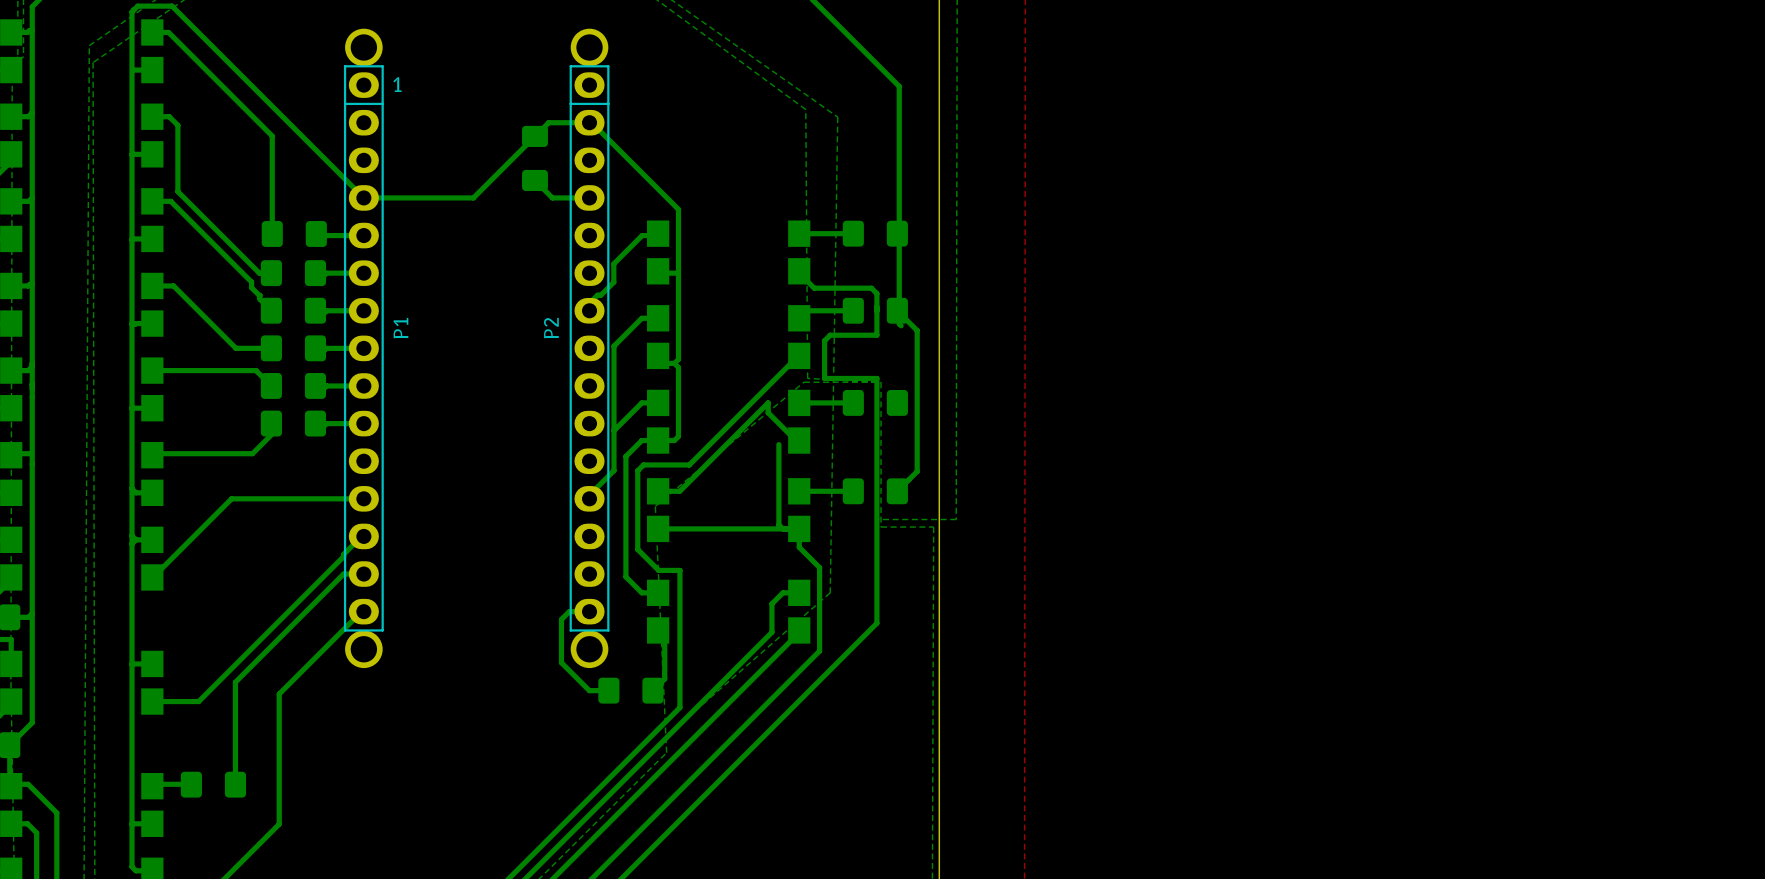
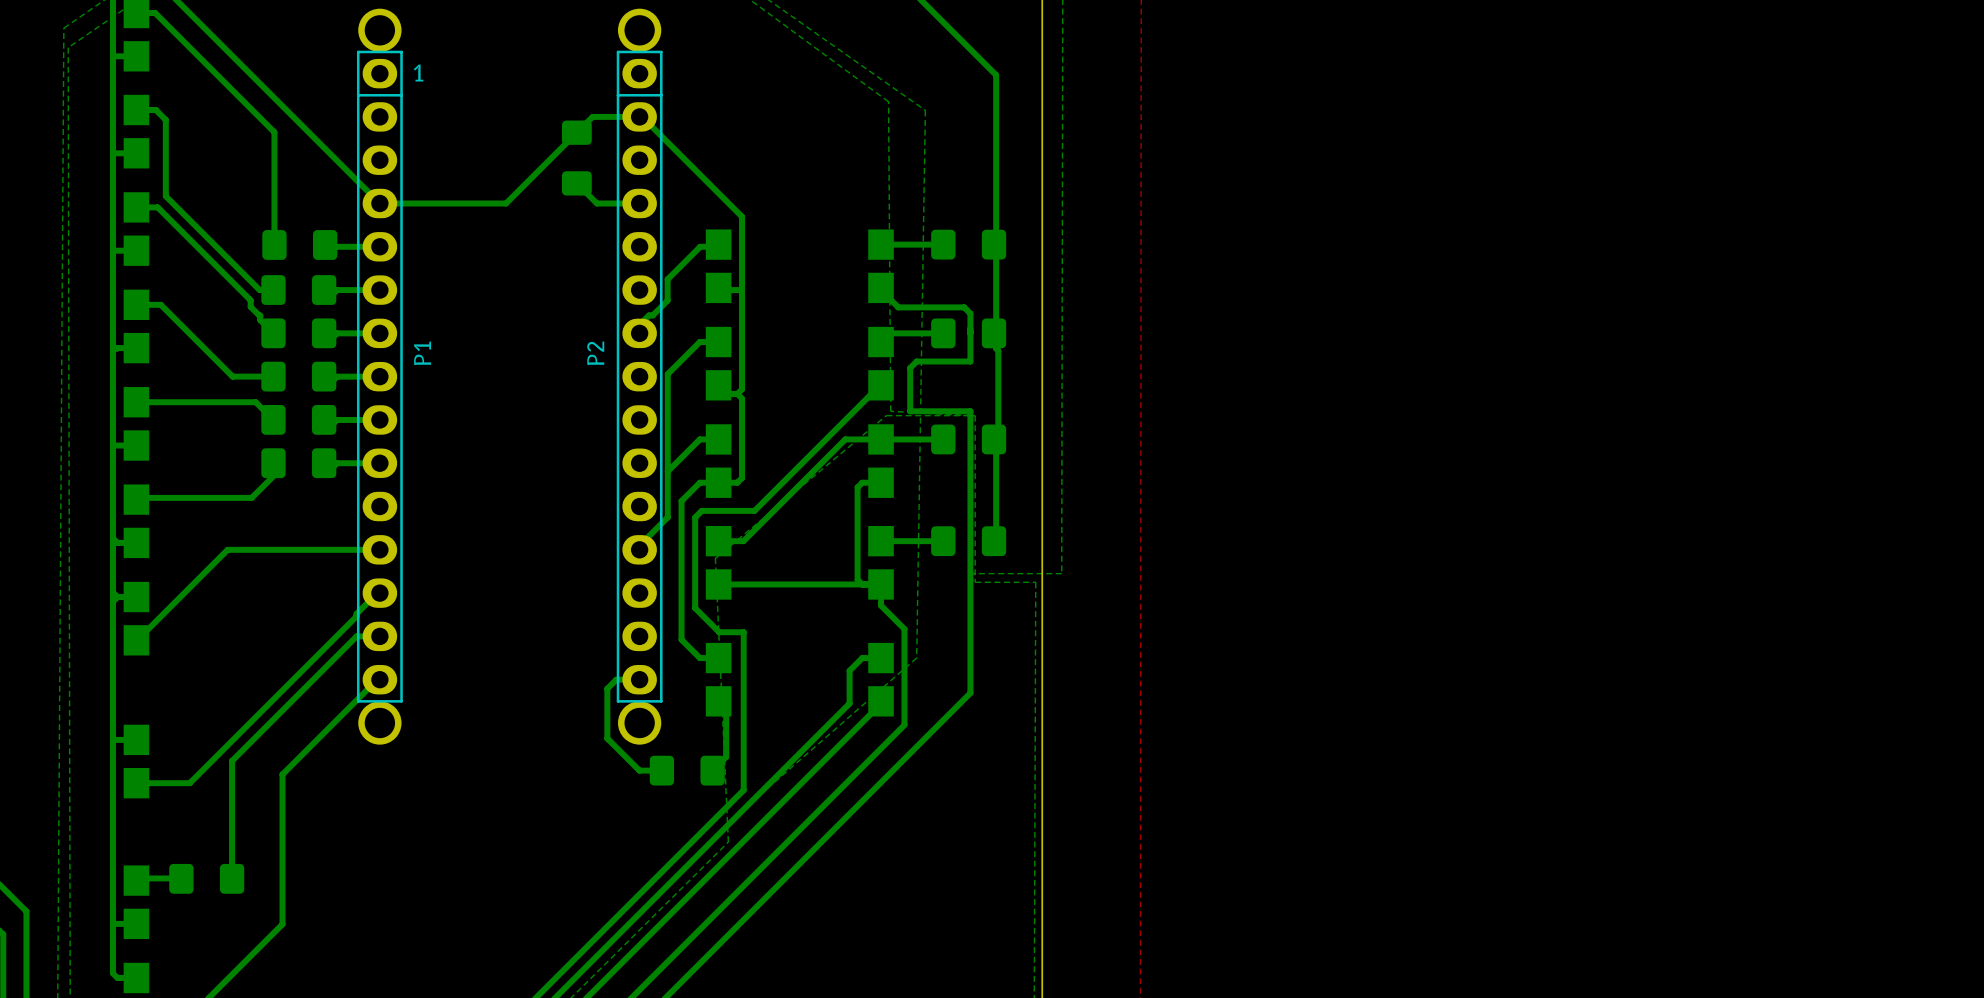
bottom track: (897, 310) (917, 330) (917, 471) (897, 491) -> none
bottom track: none -> (998, 350) (998, 437)
bottom track: (768, 402) (768, 412) (795, 440) -> (845, 439) (878, 439)
bottom track: none -> (996, 439) (996, 541)
bottom track: none -> (877, 482) (862, 482) (857, 487)

